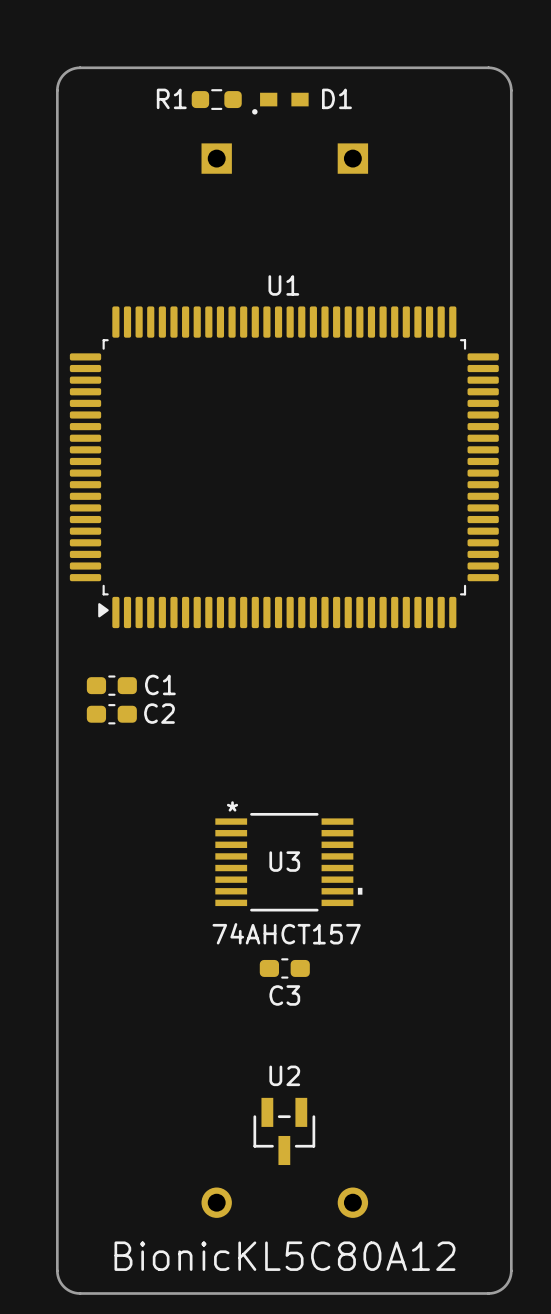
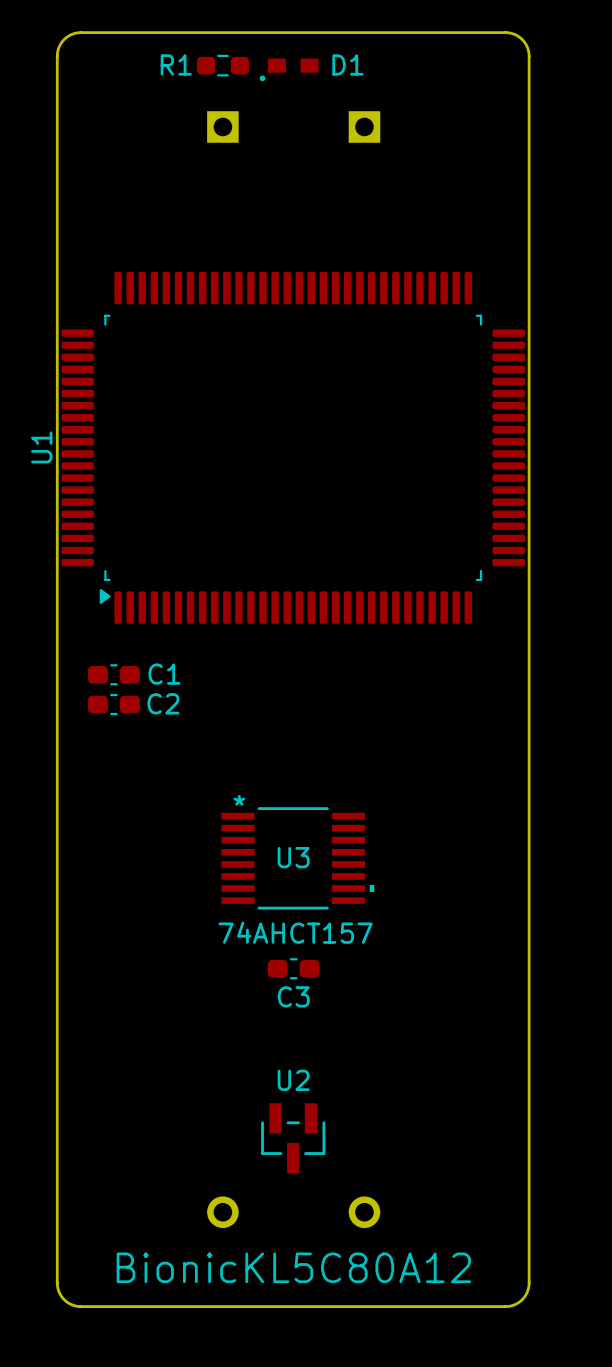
U1 name rotation: 0° (283, 285) -> 90° counterclockwise (41, 447)
U1 name position: U1 (283, 285) -> U1 (41, 447)
U1 footprint: [69, 306, 499, 629] -> [61, 271, 525, 624]

